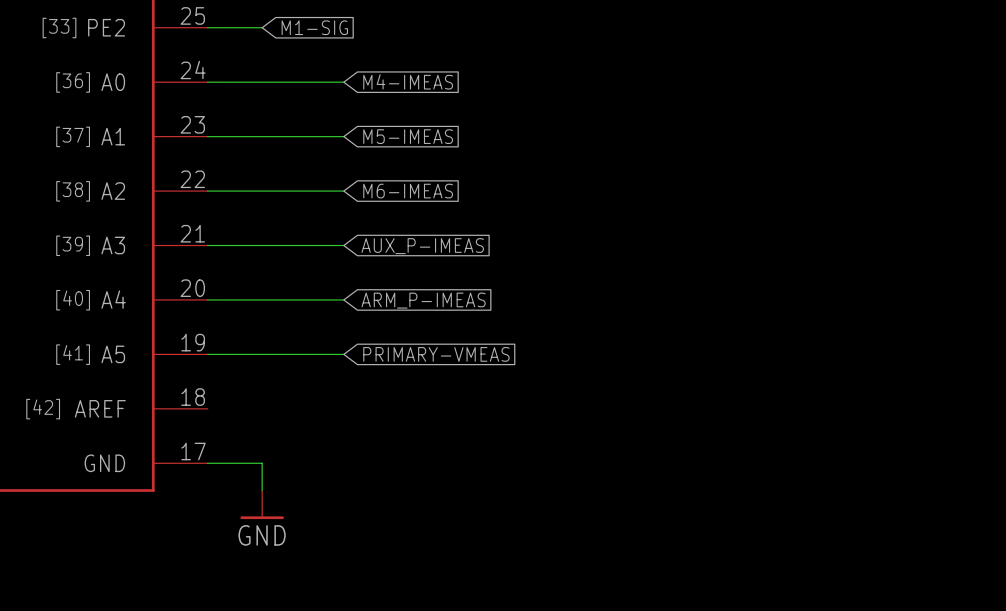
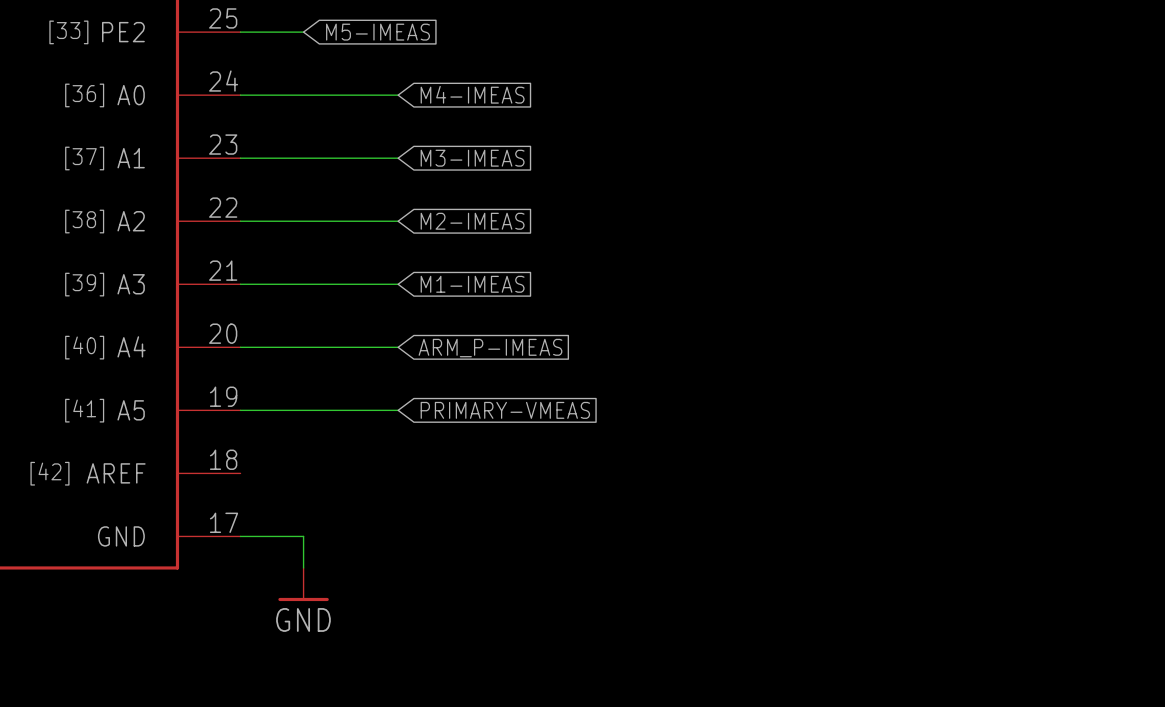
global label: M1-SIG (314, 27) -> M5-IMEAS (378, 32)
global label: M5-IMEAS (408, 136) -> M3-IMEAS (472, 158)
global label: M6-IMEAS (408, 191) -> M2-IMEAS (472, 221)
global label: AUX_P-IMEAS (422, 246) -> M1-IMEAS (472, 284)

